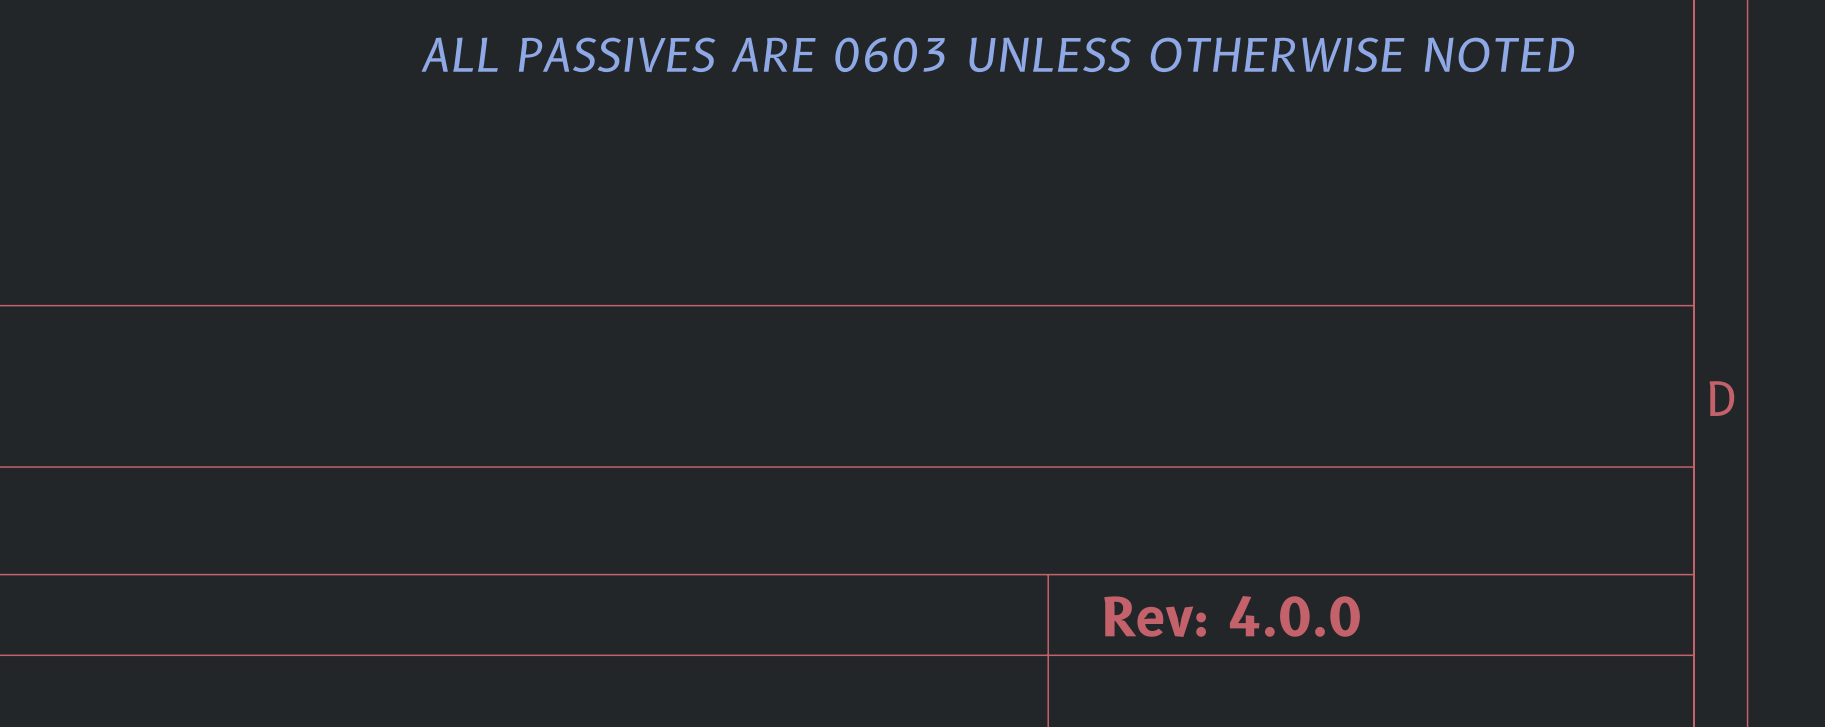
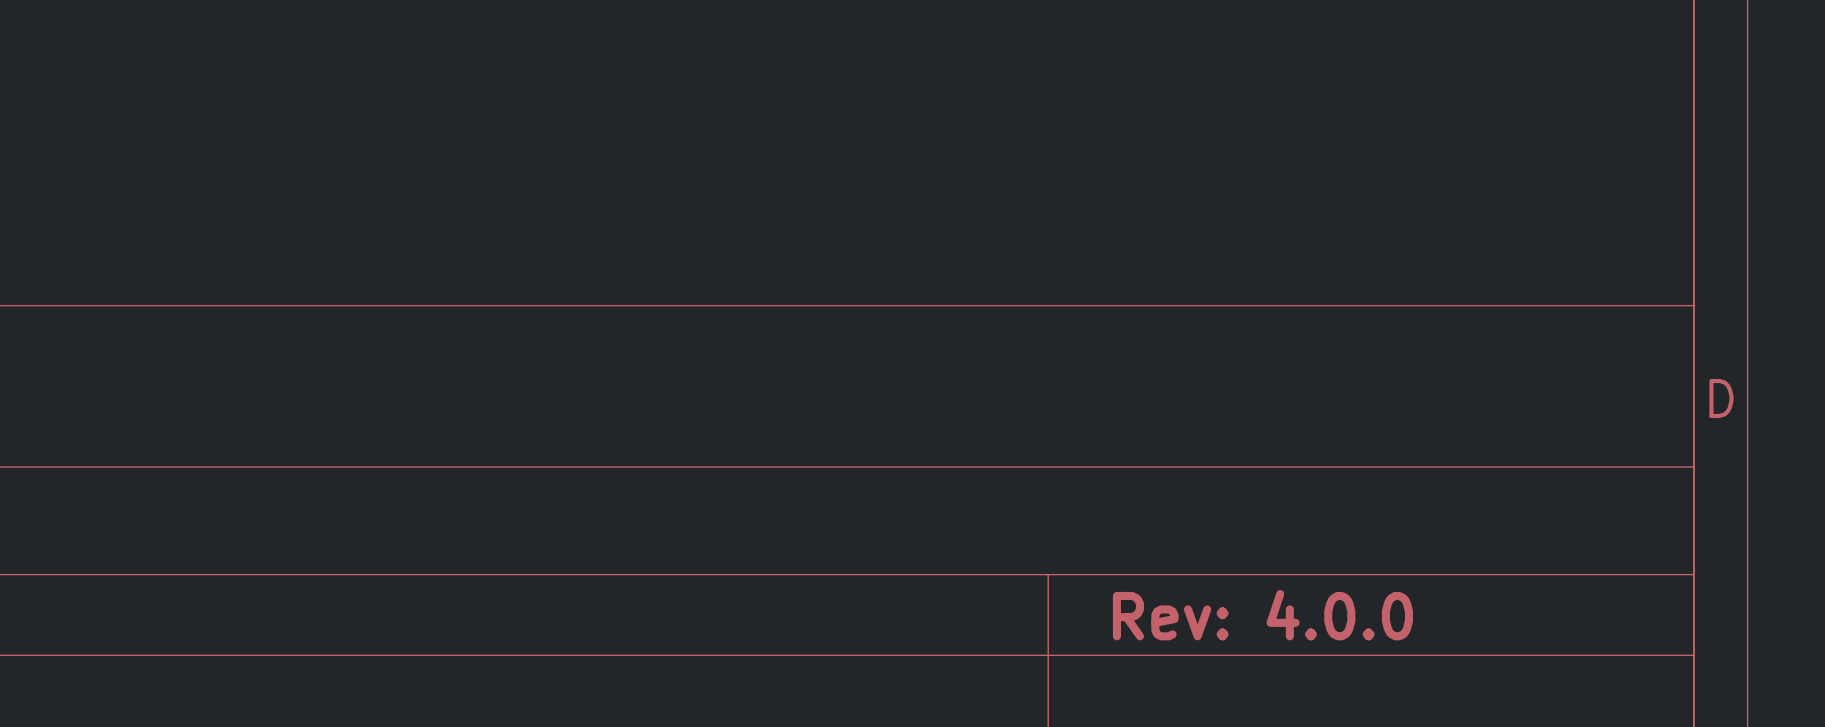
text: ALL PASSIVES ARE 0603 UNLESS OTHERWISE NOTED (998, 54) -> none

